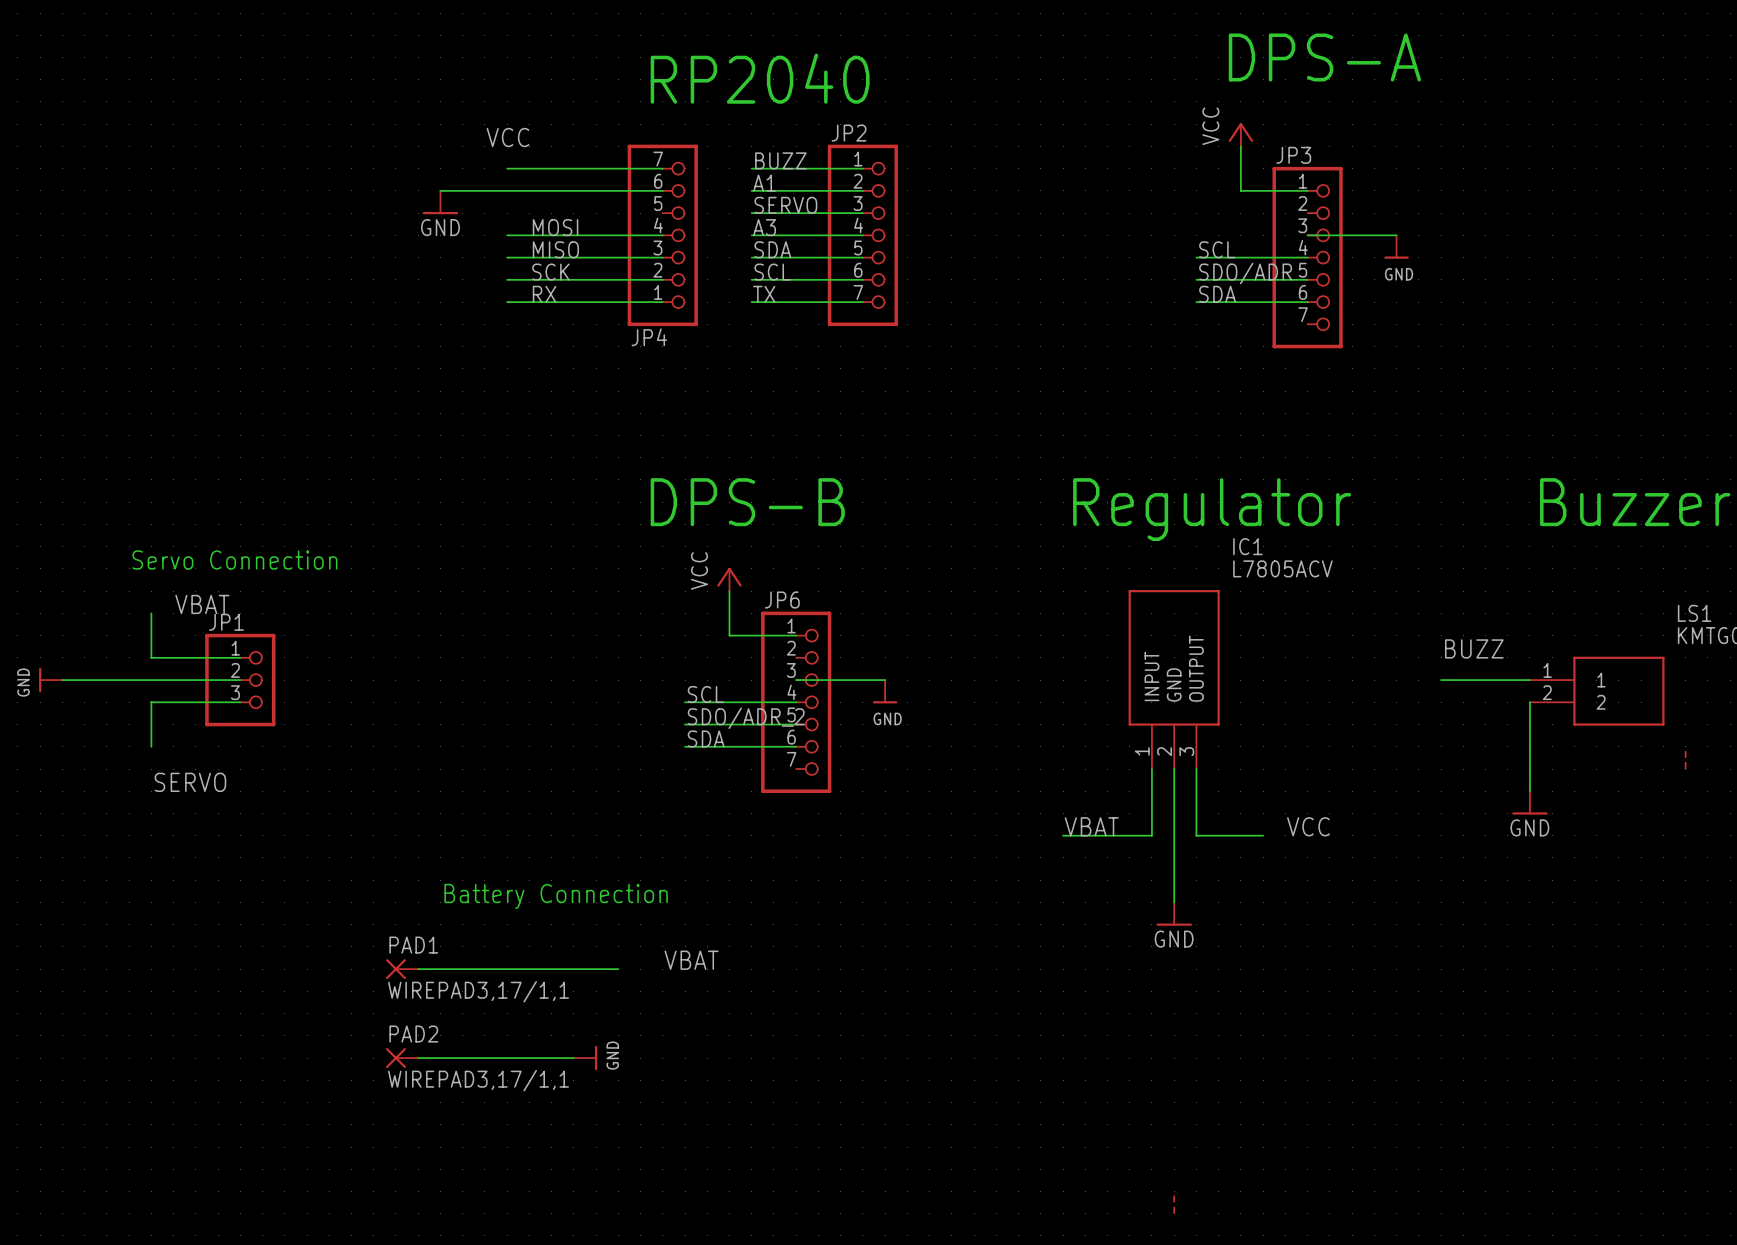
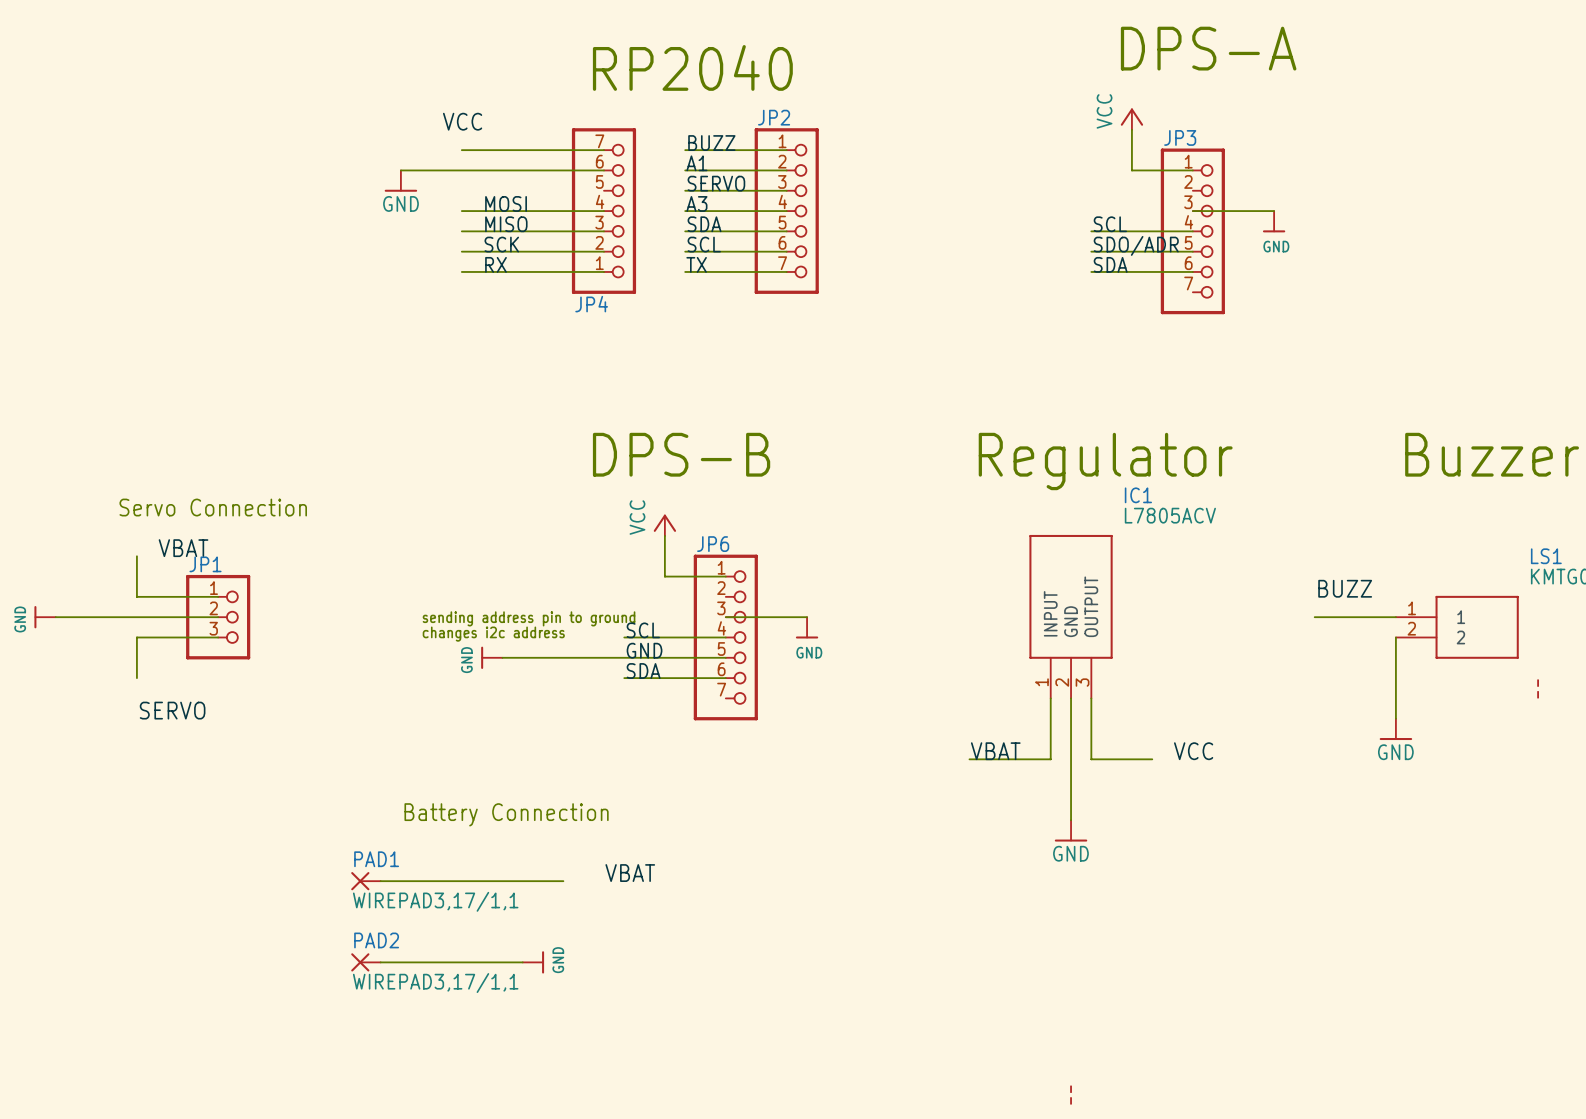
text: none -> sending address pin to ground (529, 618)
text: none -> changes i2c address (493, 634)
label: SDO/ADR_2 (746, 718) -> GND (644, 650)
power symbol: none -> GND (491, 657)
wire: none -> (502, 657) (624, 657)

